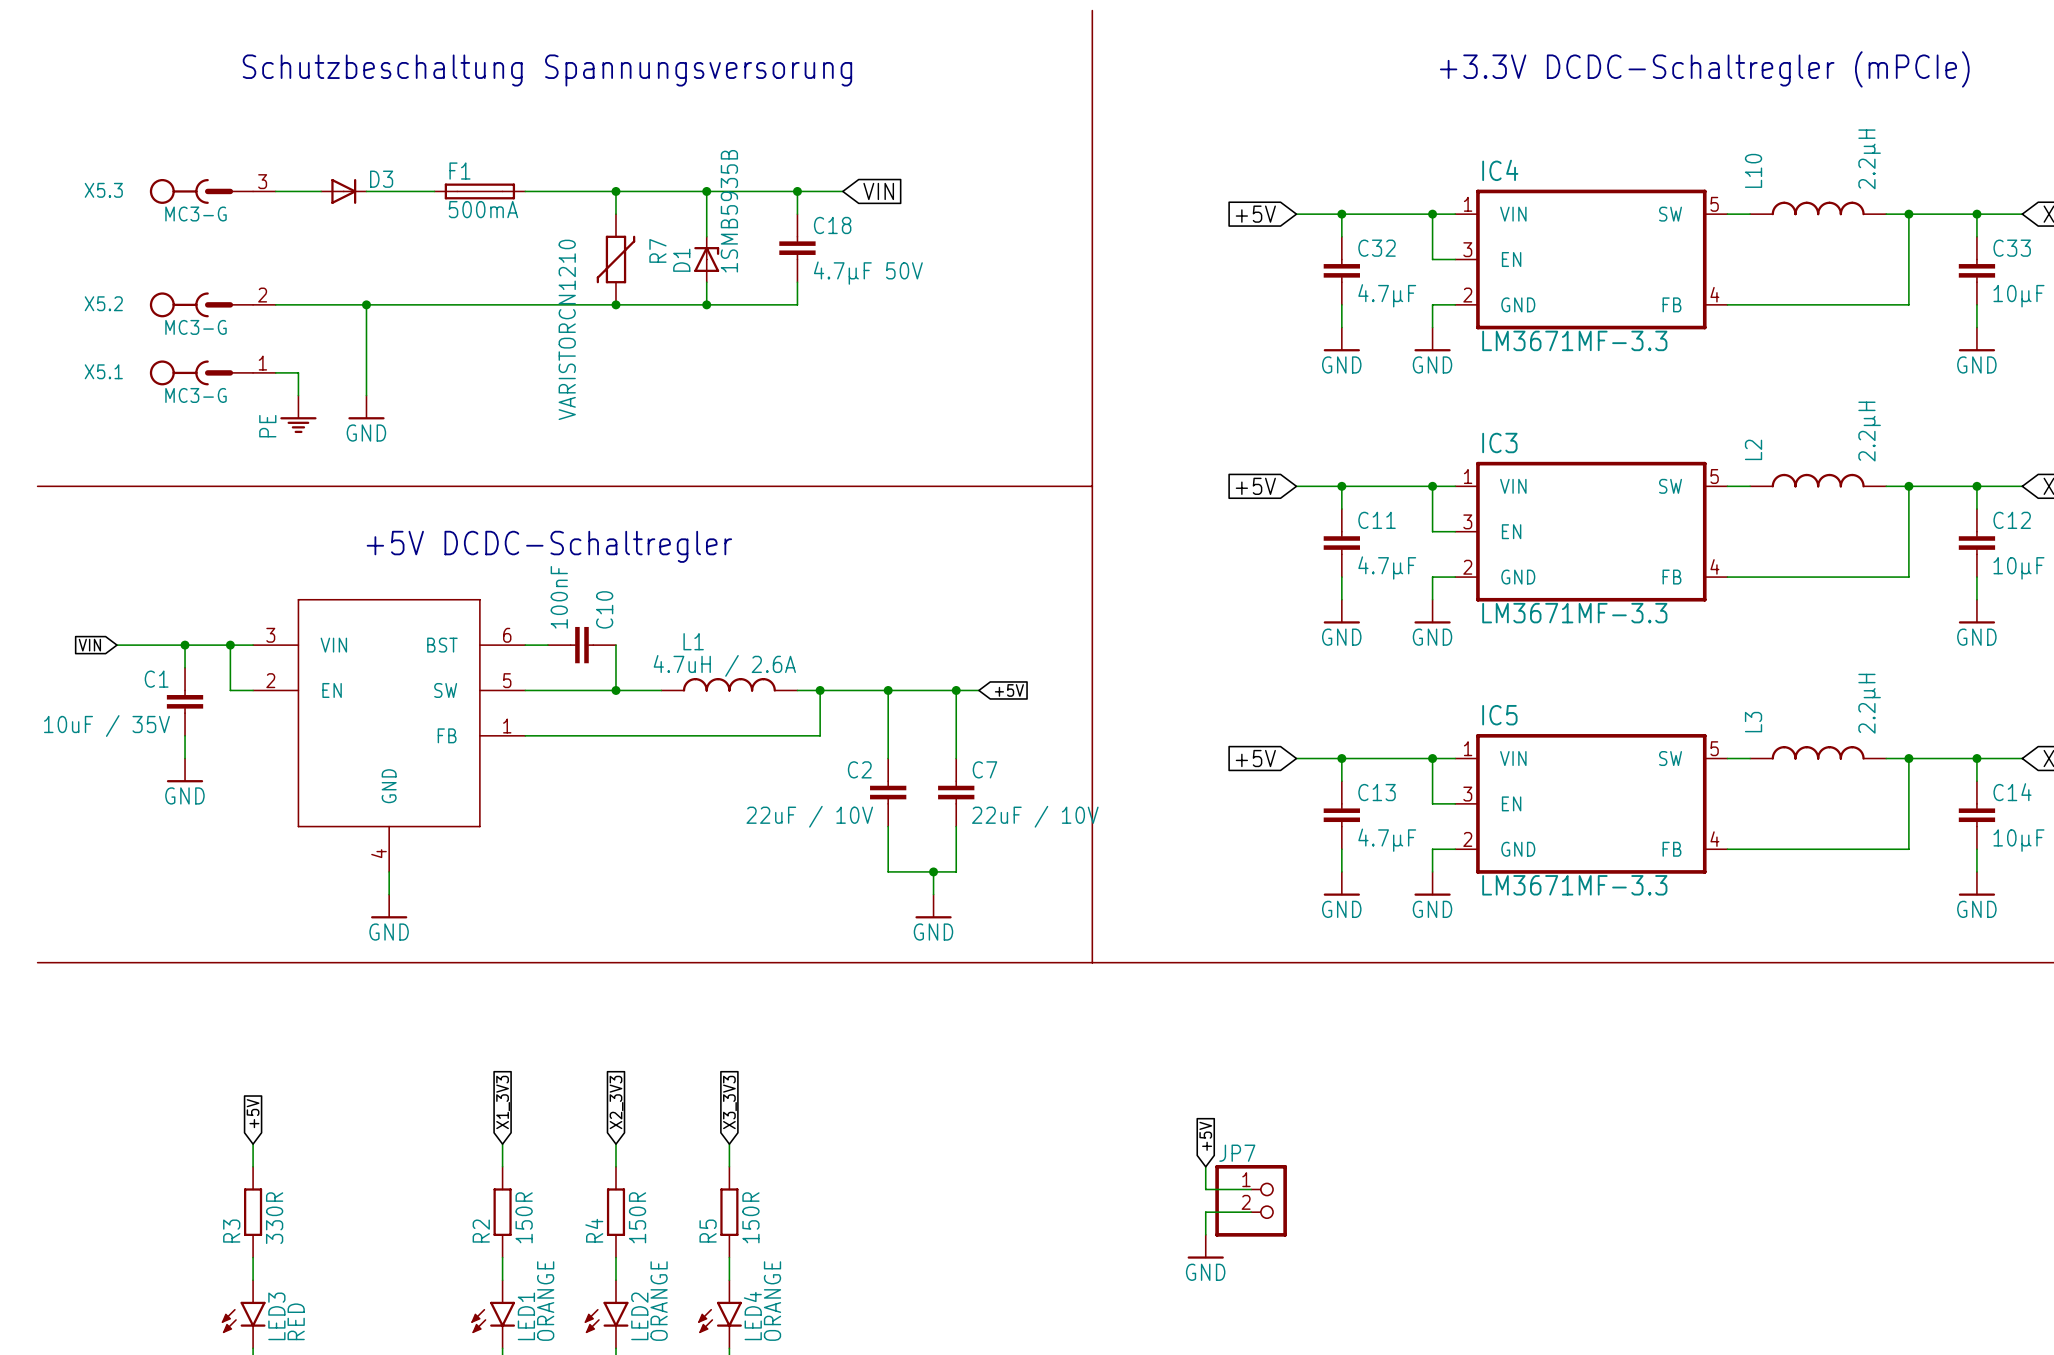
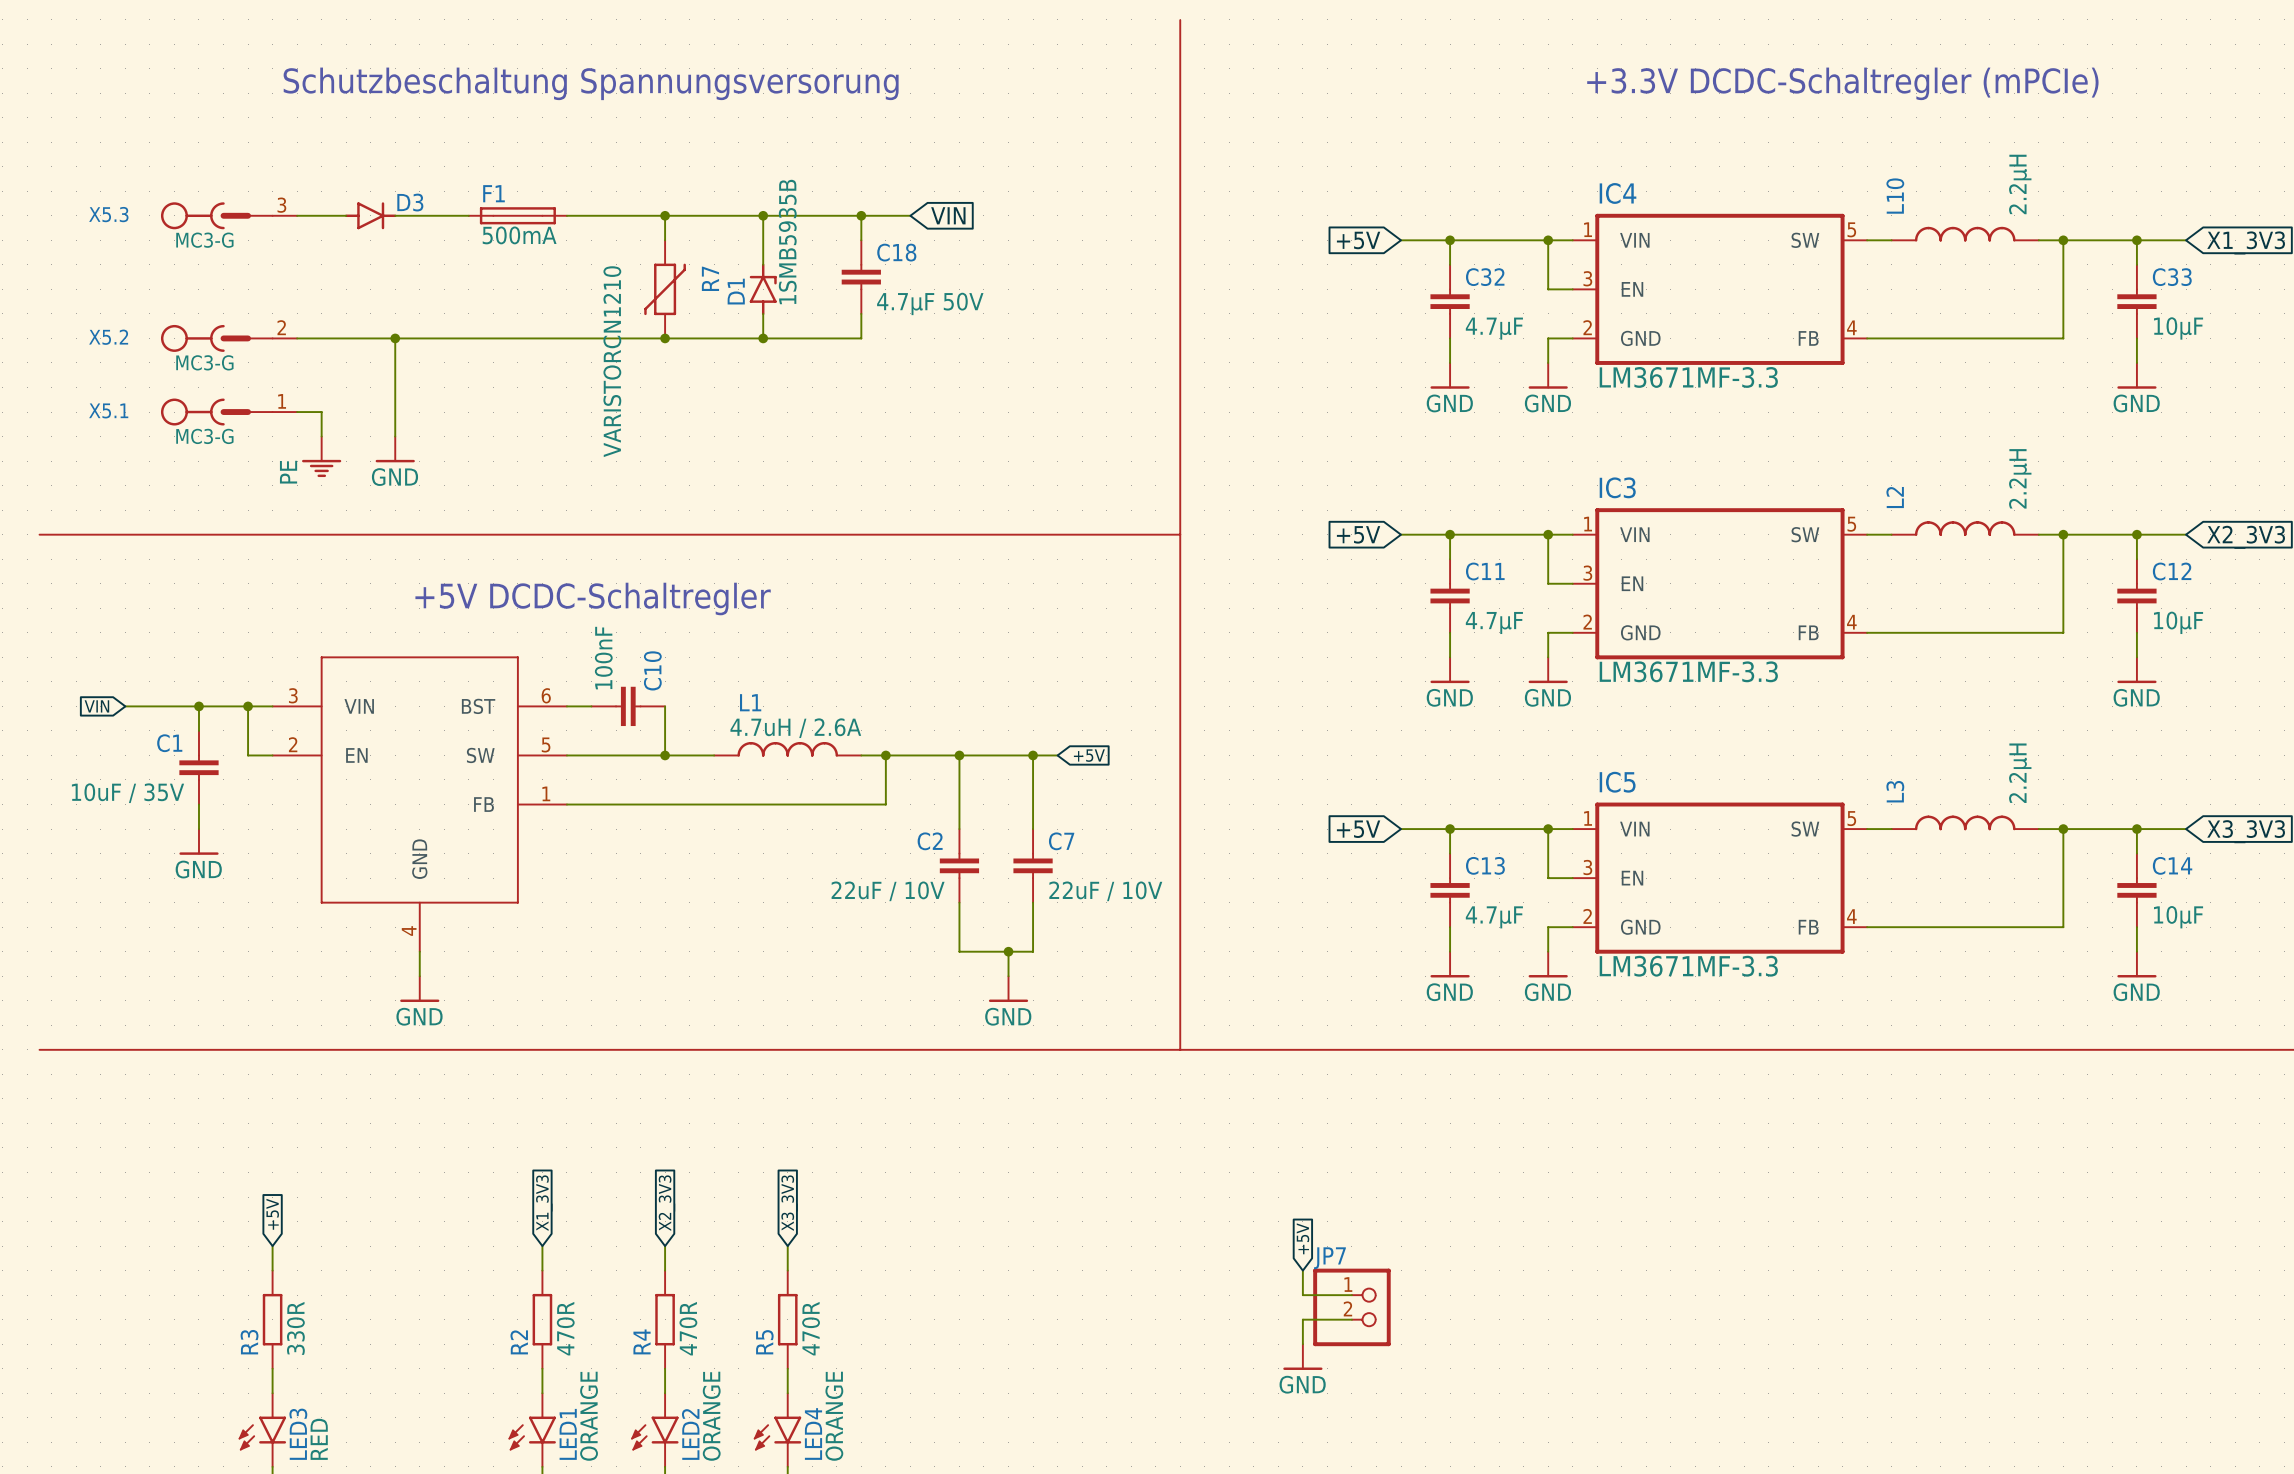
D3 symbol: [321, 178, 367, 204] -> [344, 202, 397, 230]
D1 symbol: [694, 236, 720, 283] -> [749, 263, 777, 316]
R2 value: 150R (524, 1217) -> 470R (565, 1328)
R4 value: 150R (637, 1217) -> 470R (688, 1328)
R5 value: 150R (750, 1217) -> 470R (811, 1328)

